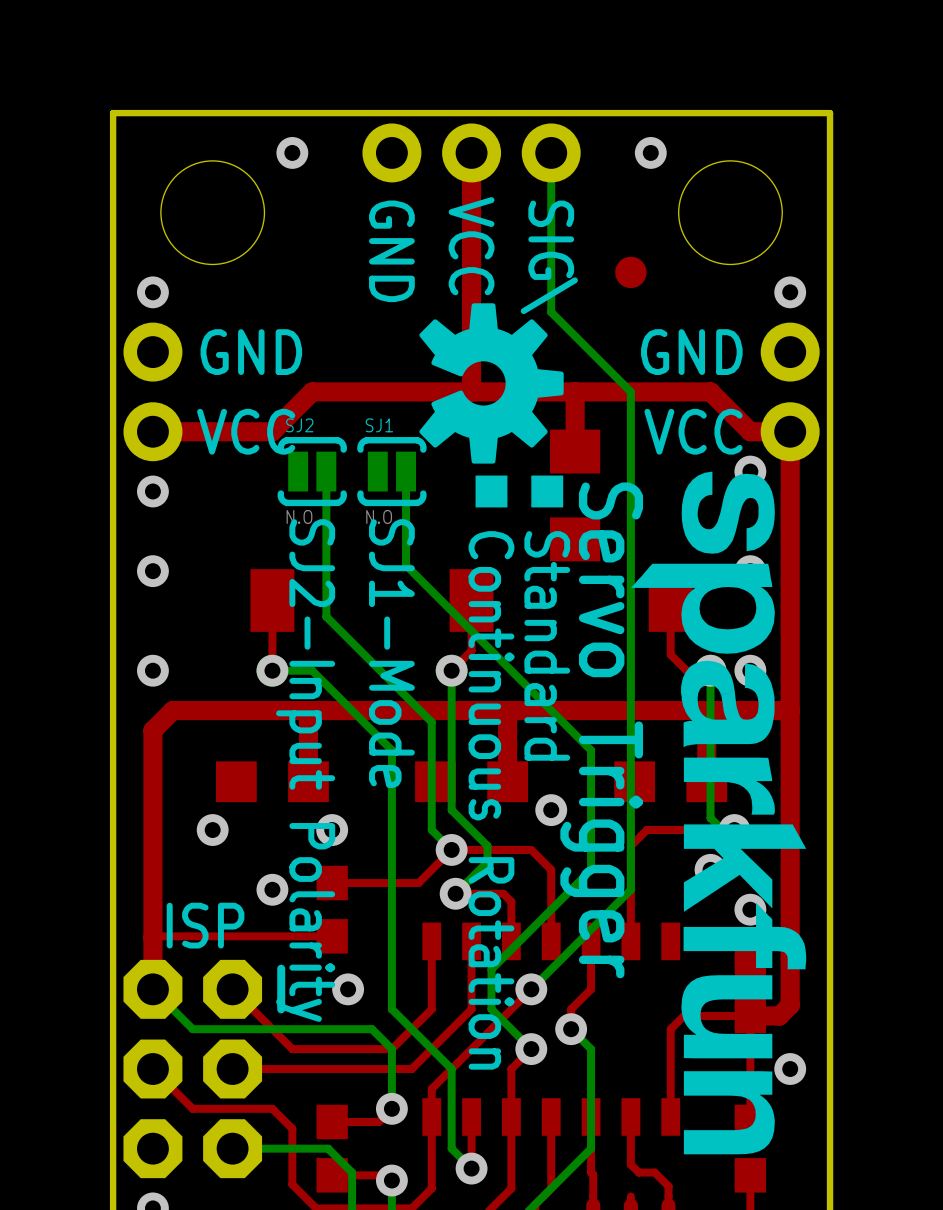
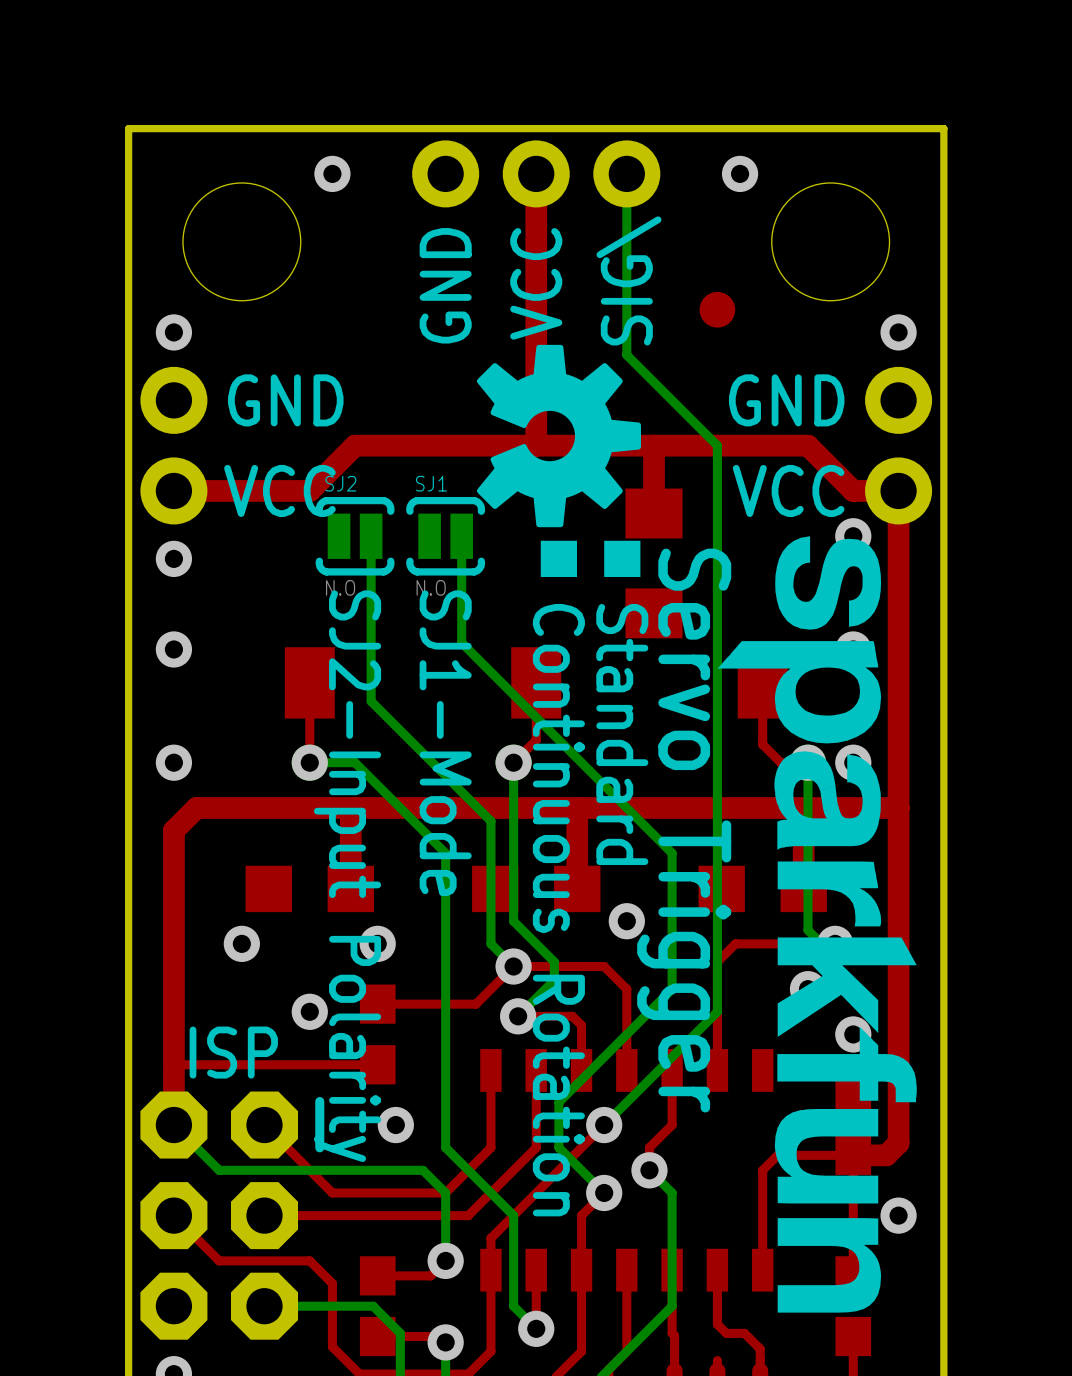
text rotation: 0° (471, 246) -> 180° (536, 283)
text rotation: 0° (391, 251) -> 180° (445, 285)
text rotation: 0° (549, 257) -> 180° (628, 280)

